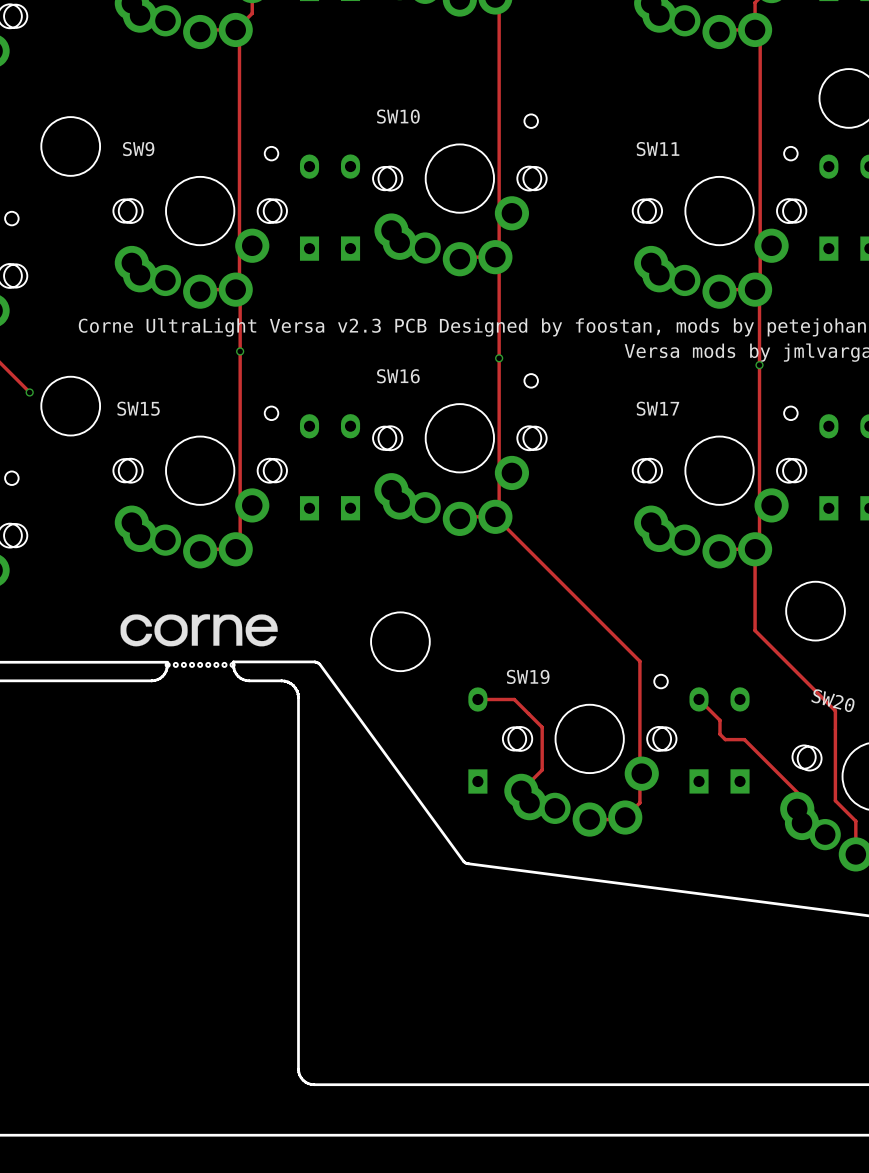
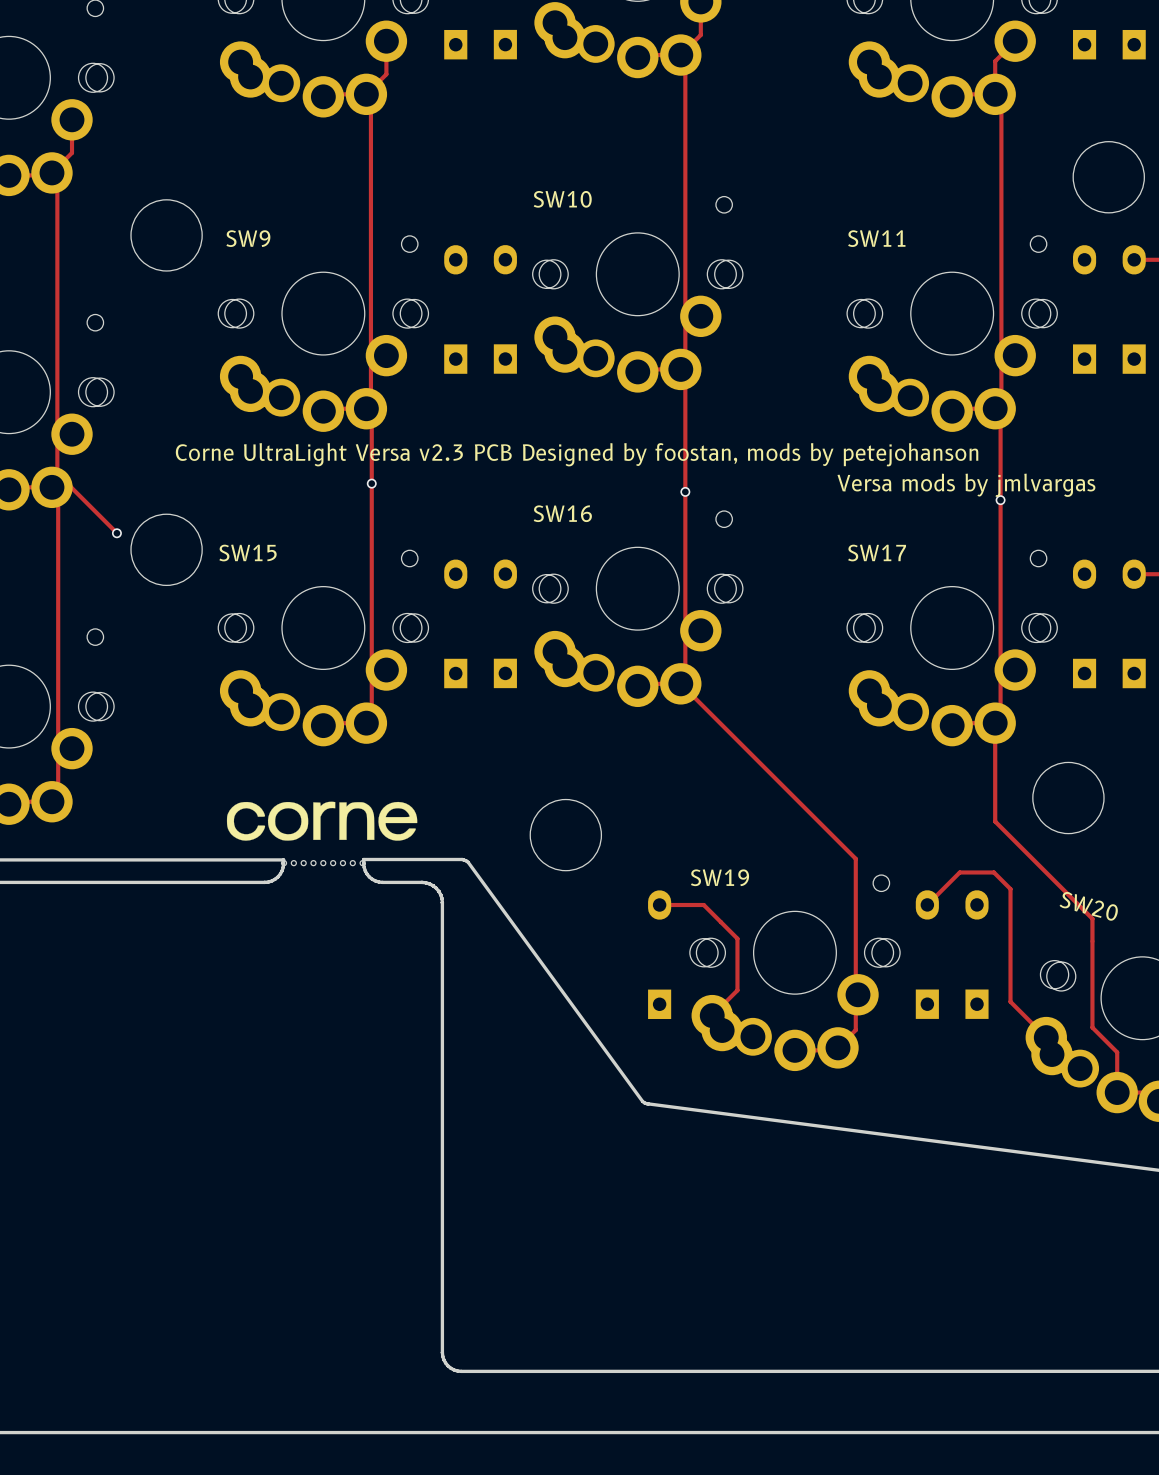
track: (699, 699) (719, 720) (719, 734) -> (927, 904) (959, 872) (993, 872) (1010, 889) (1010, 1001) (1046, 1037)
track: (719, 734) (725, 739) (744, 739) (801, 797) -> none

